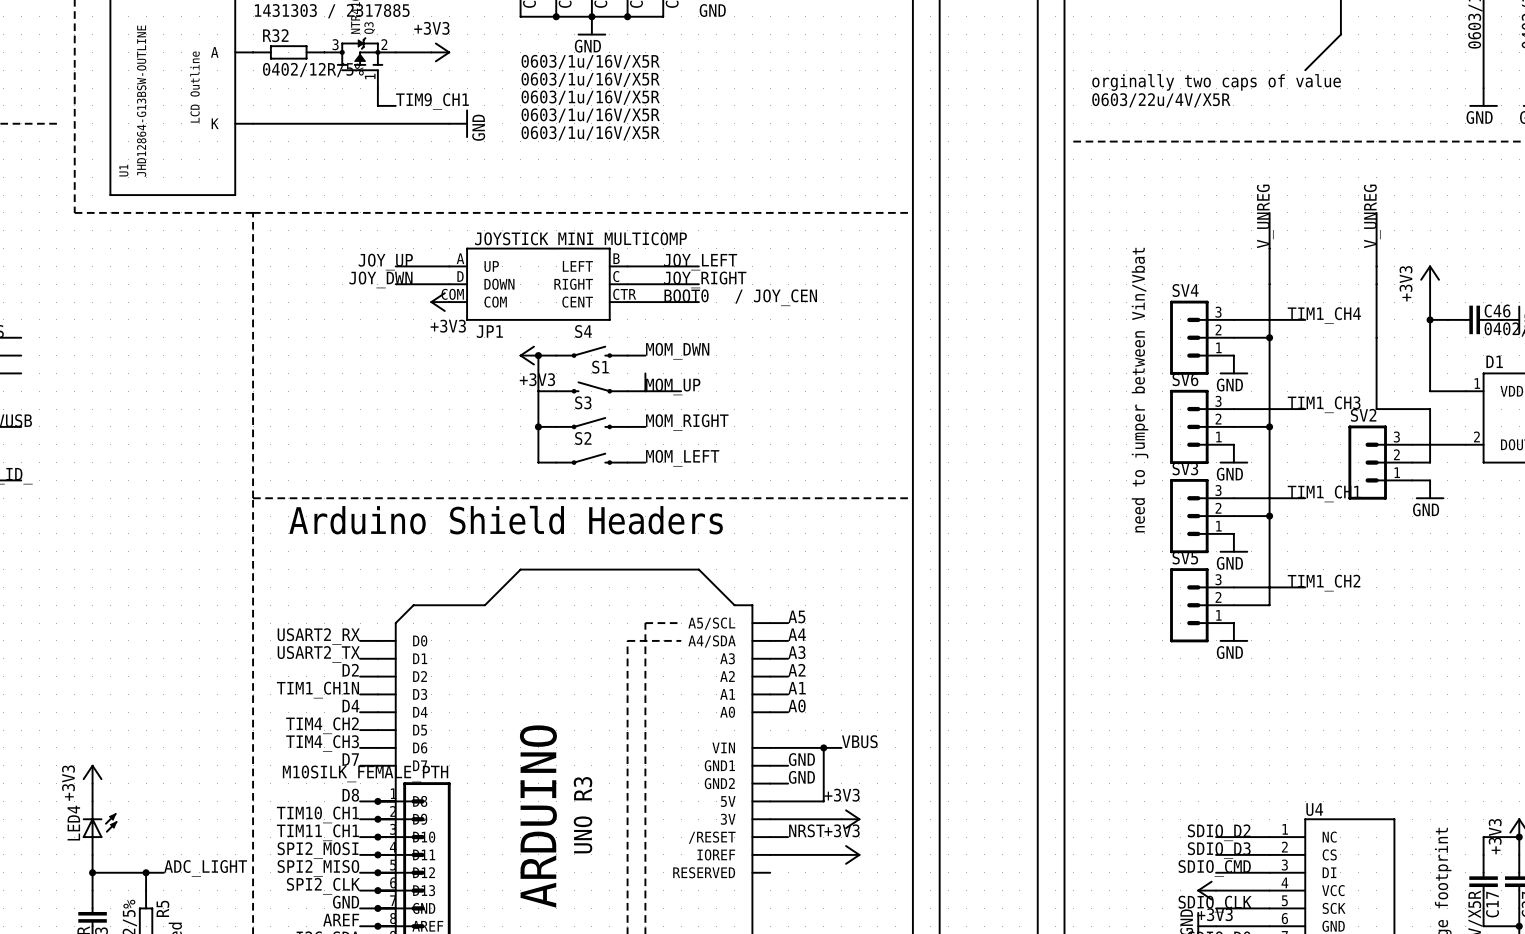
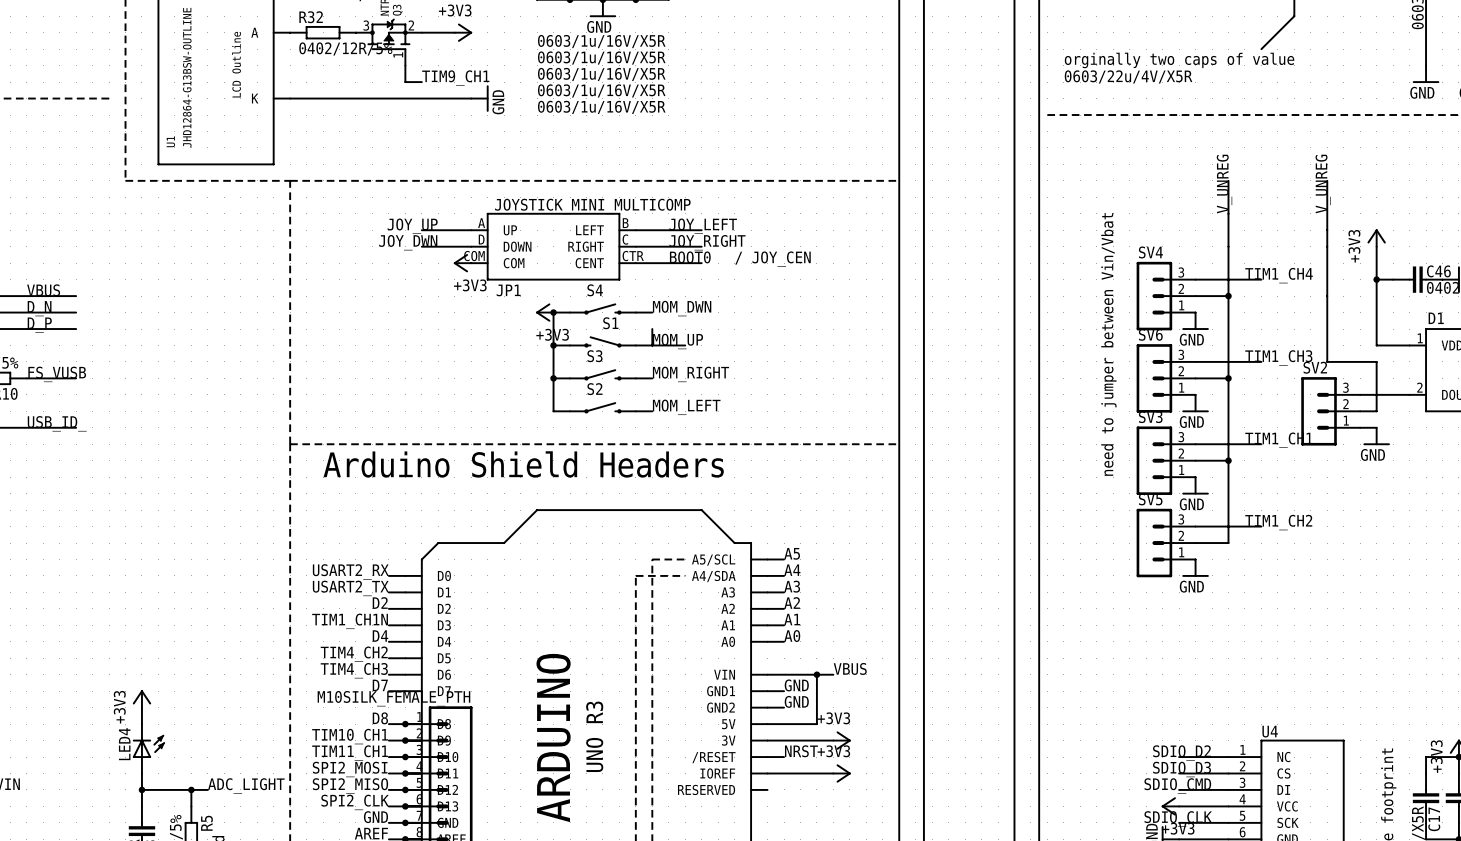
junction: none -> (553, 345)

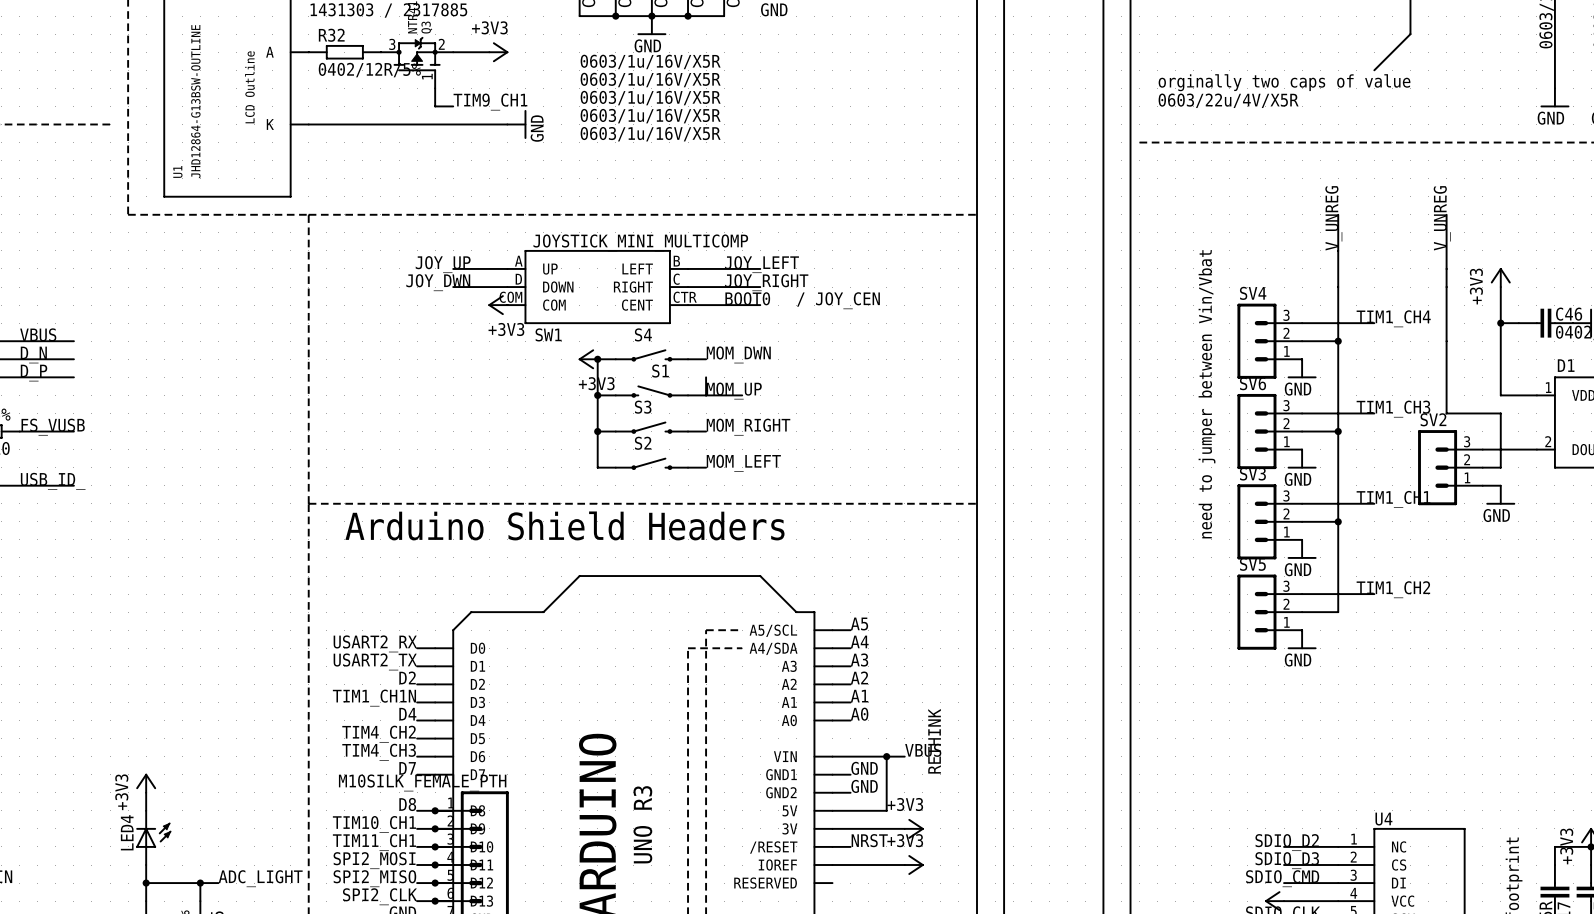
JP1 name: JP1 (508, 290) -> SW1 (548, 334)
text: none -> RETHINK (934, 741)

